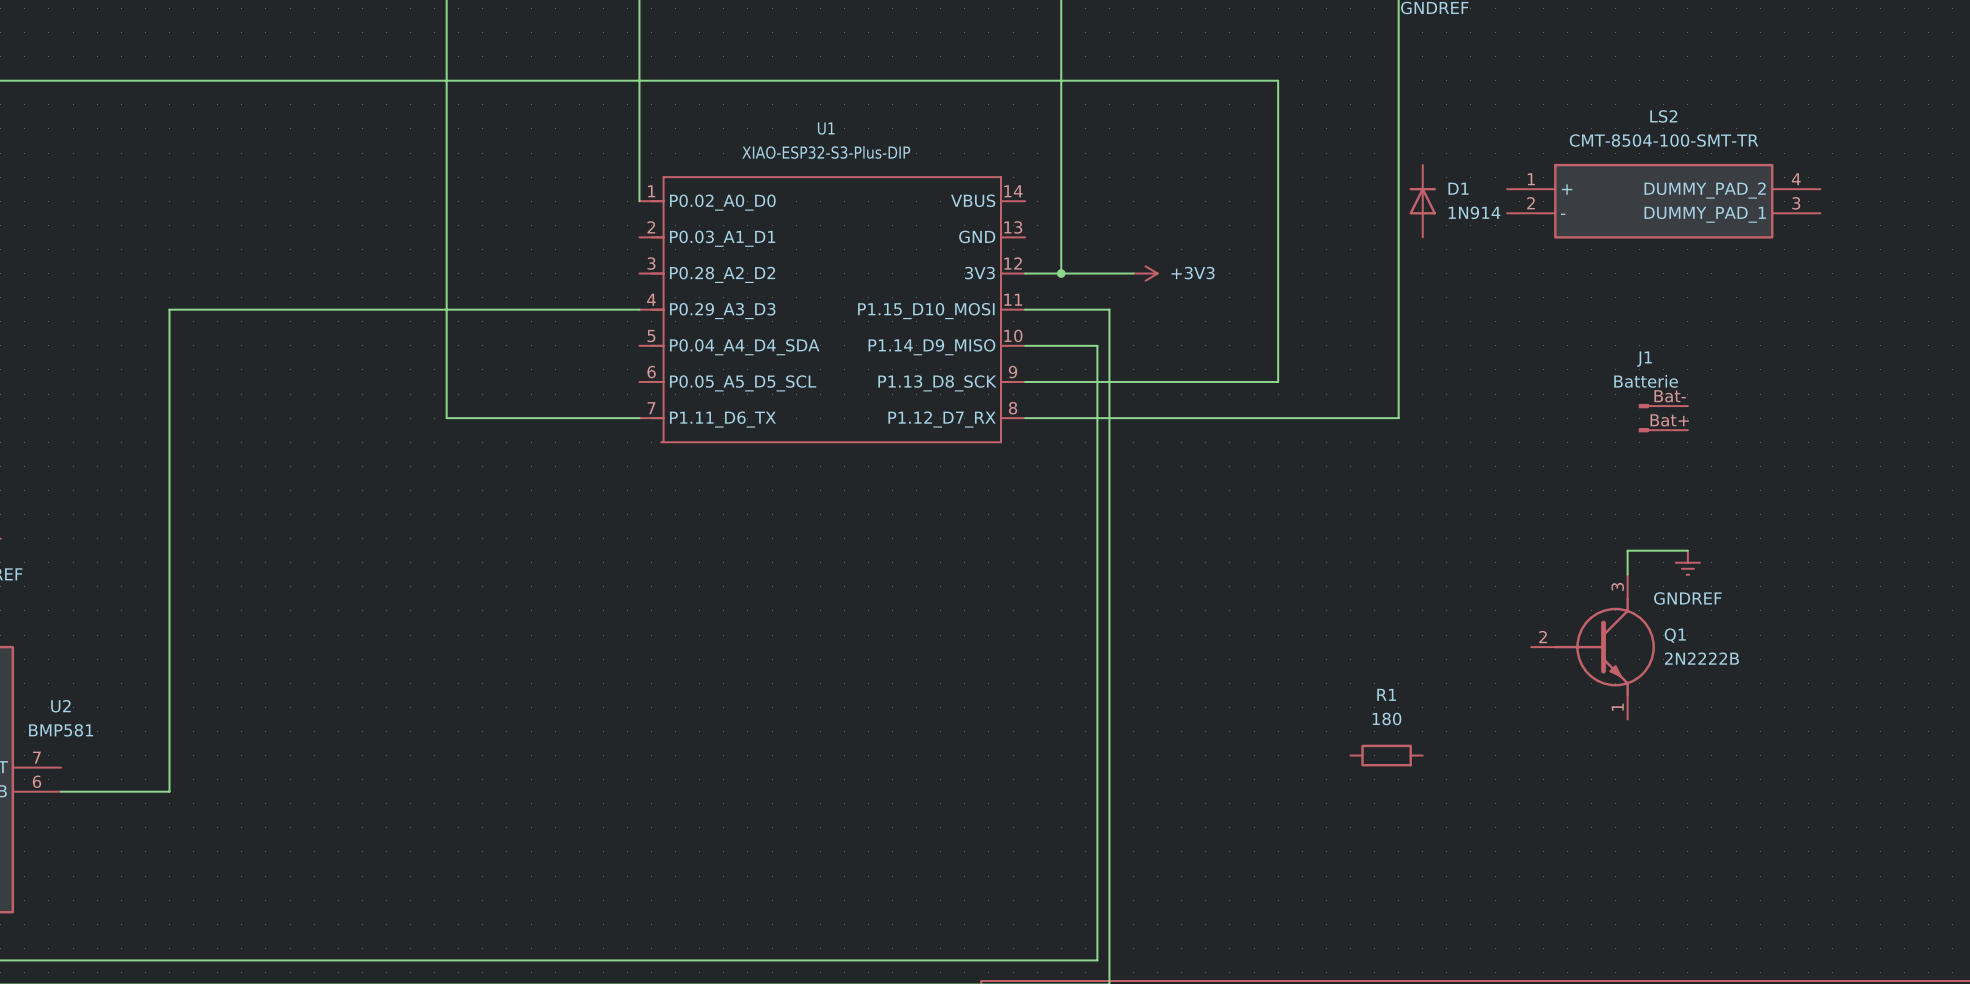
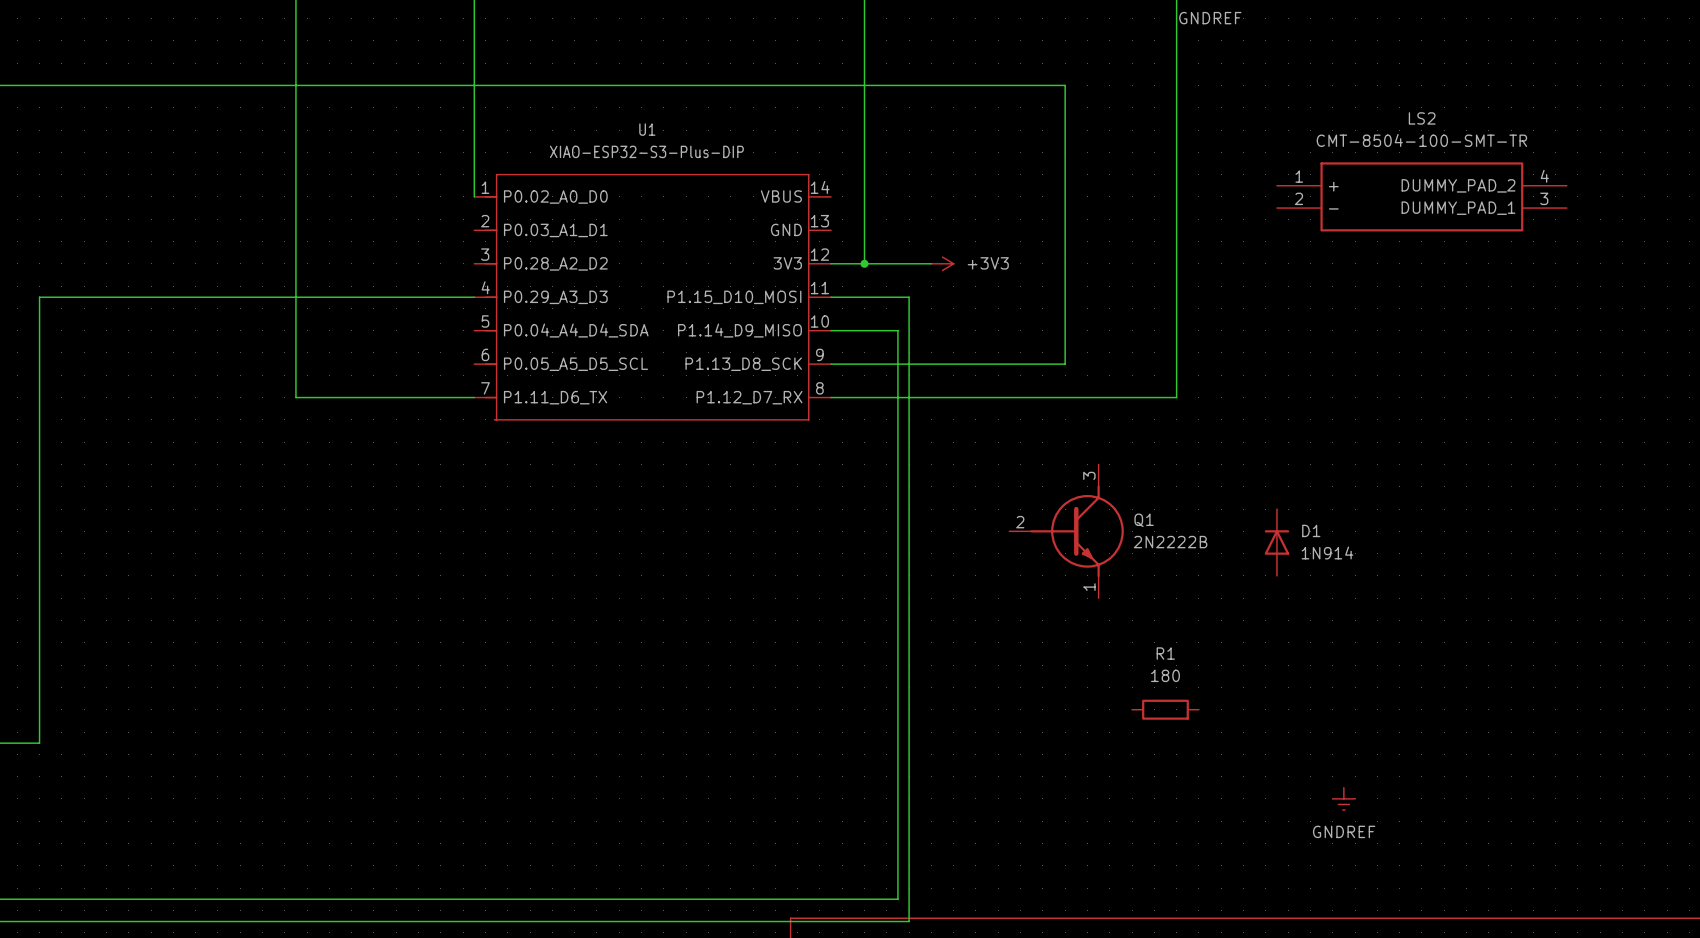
D1 position: (1422, 201) -> (1276, 542)
J1: Batterie (1663, 418) -> none
wire: (1687, 550) (1627, 550) (1627, 574) -> none
power symbol: GNDREF (1687, 562) -> none
Q1 position: (1593, 647) -> (1066, 531)
power symbol: none -> GNDREF (1343, 798)

